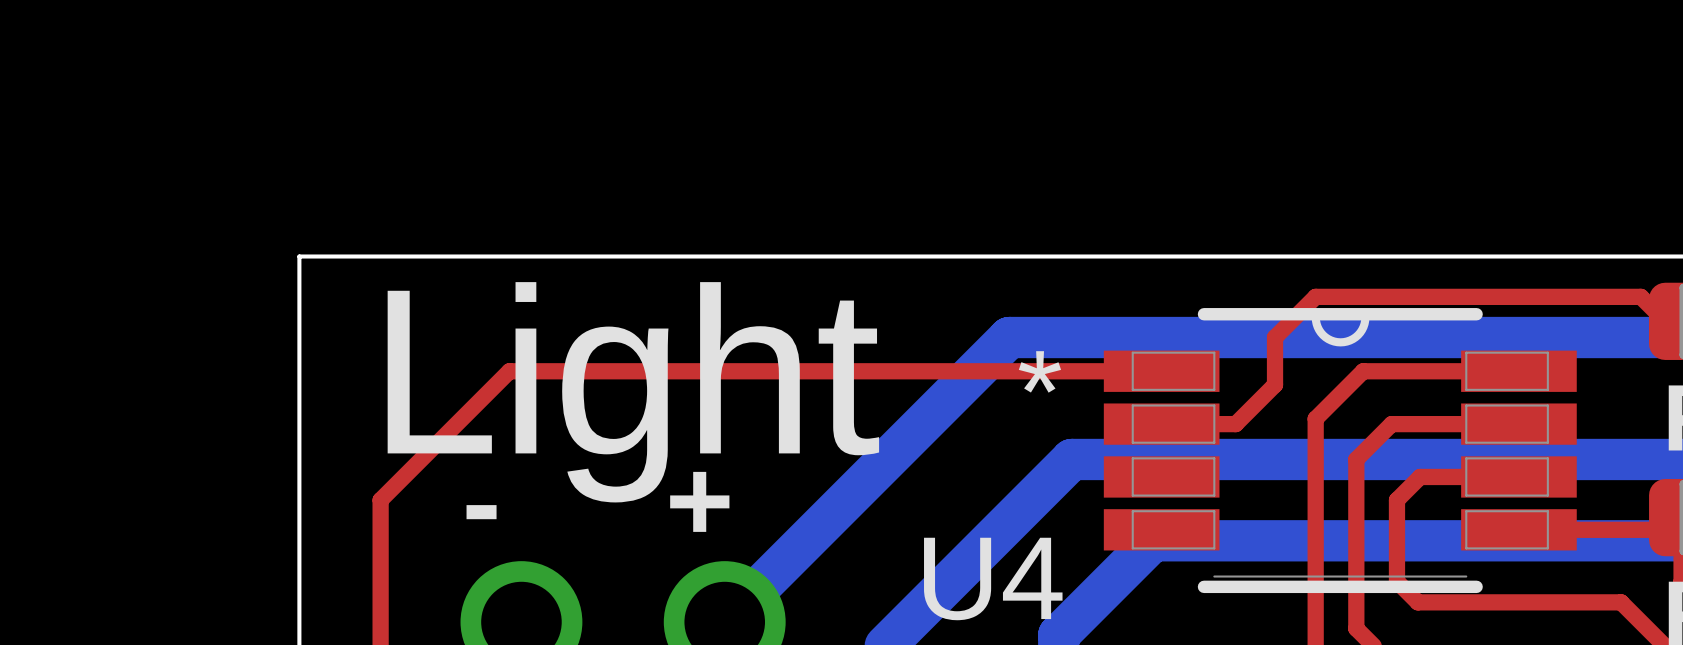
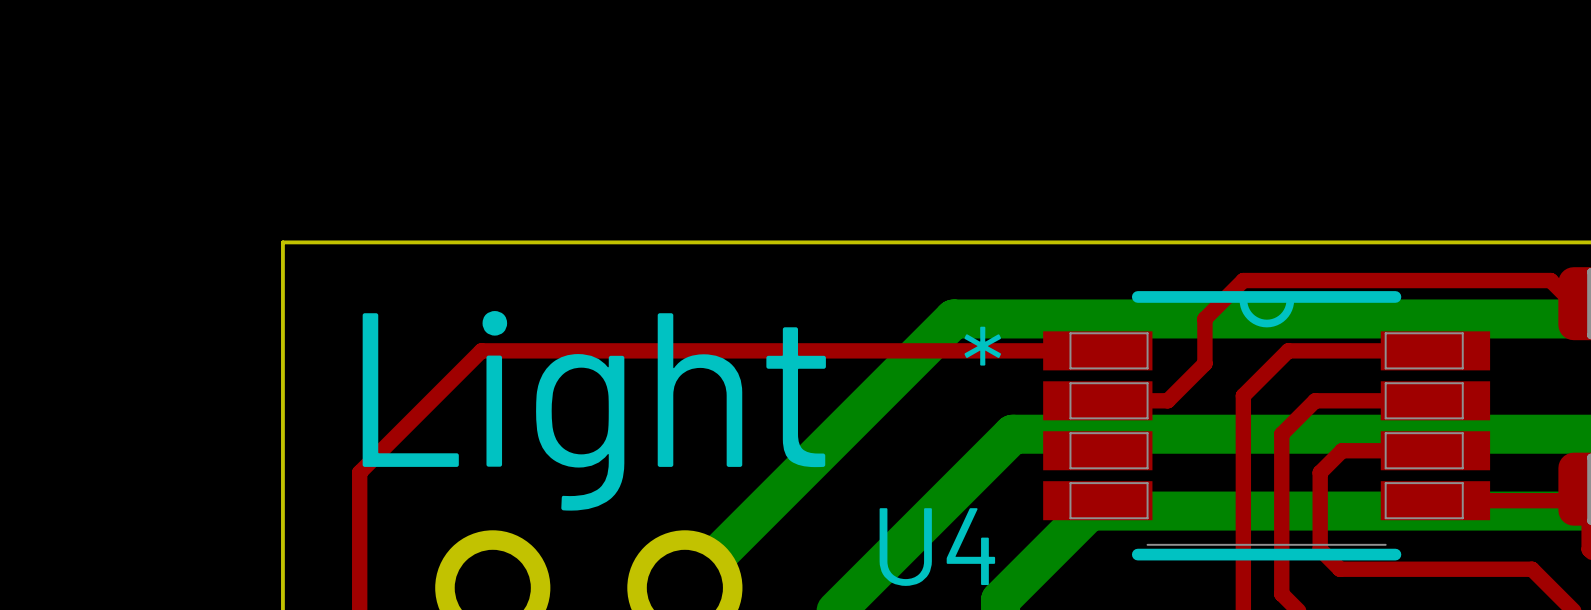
text position: Light (633, 392) -> Light (594, 410)
text: + (699, 501) -> none
text: - (481, 512) -> none

